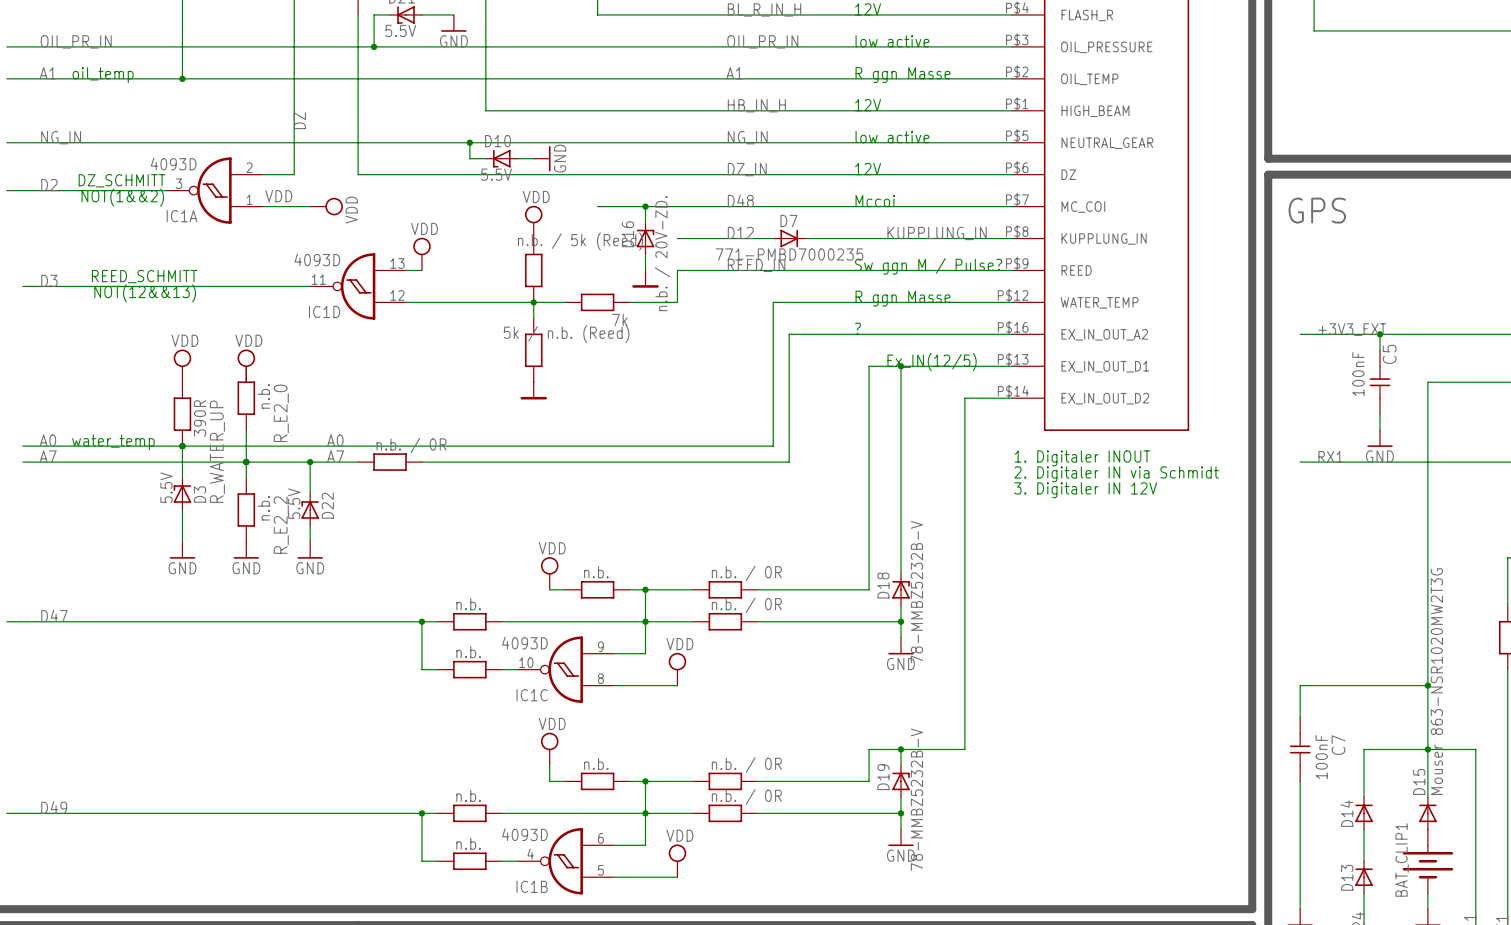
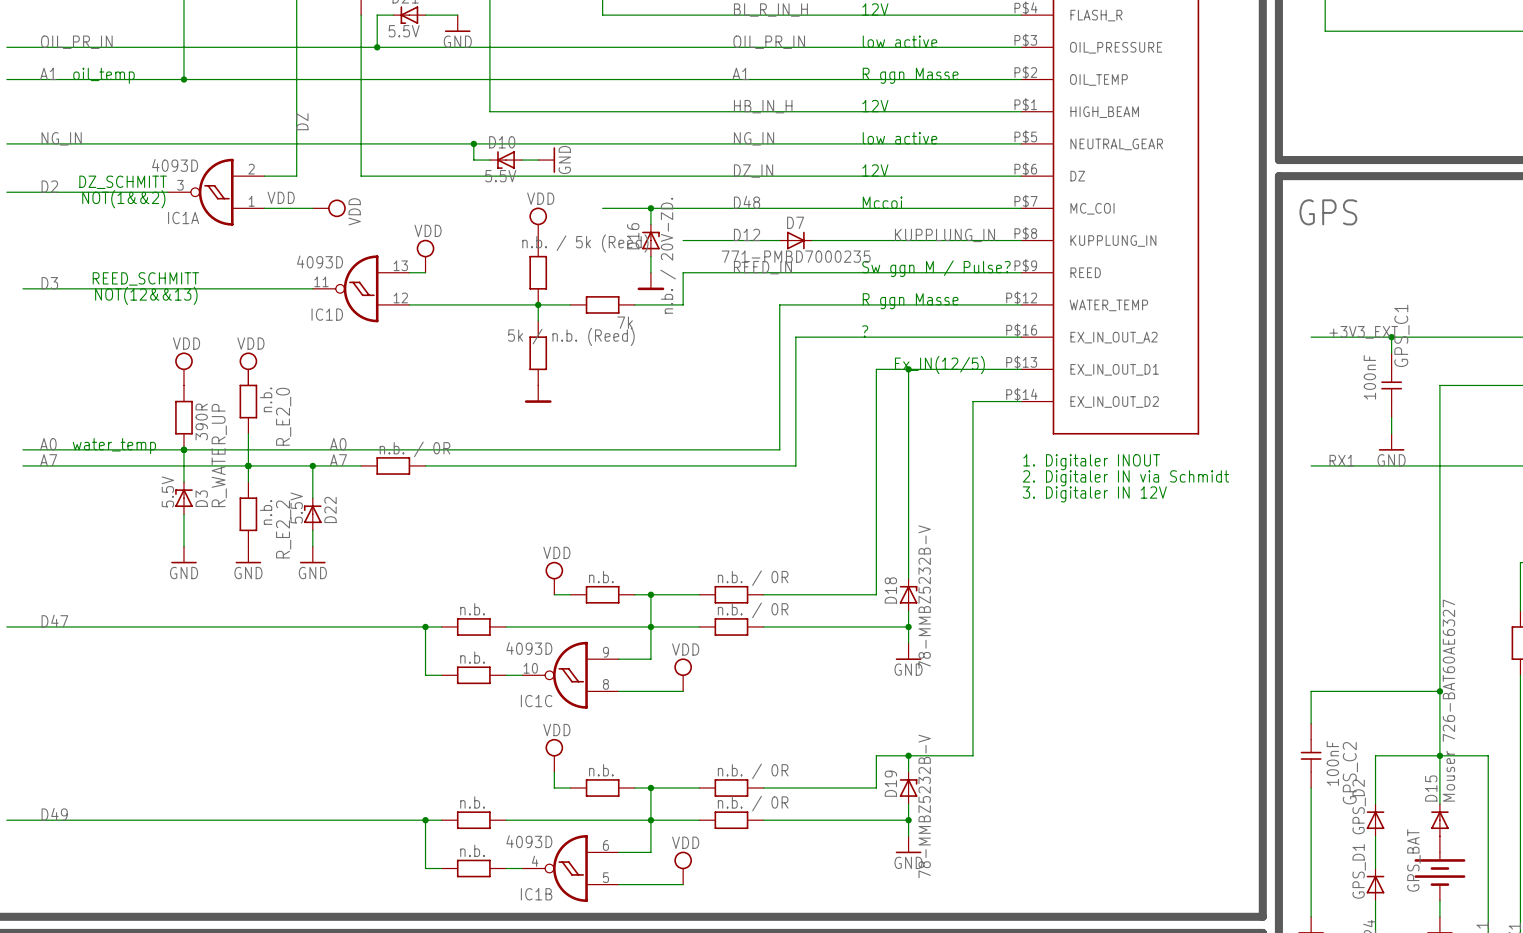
C5 name: C5 (1389, 354) -> GPS_C1 (1401, 335)
D15 value: Mouser 863-NSR1020MW2T3G (1436, 681) -> Mouser 726-BAT60AE6327 (1448, 700)
C7 name: C7 (1338, 745) -> GPS_C2 (1350, 773)
D14 name: D14 (1347, 813) -> GPS_D2 (1359, 806)
BAT_CLIP1 name: BAT_CLIP1 (1402, 860) -> GPS_BAT (1413, 860)
D13 name: D13 (1347, 877) -> GPS_D1 (1359, 871)

